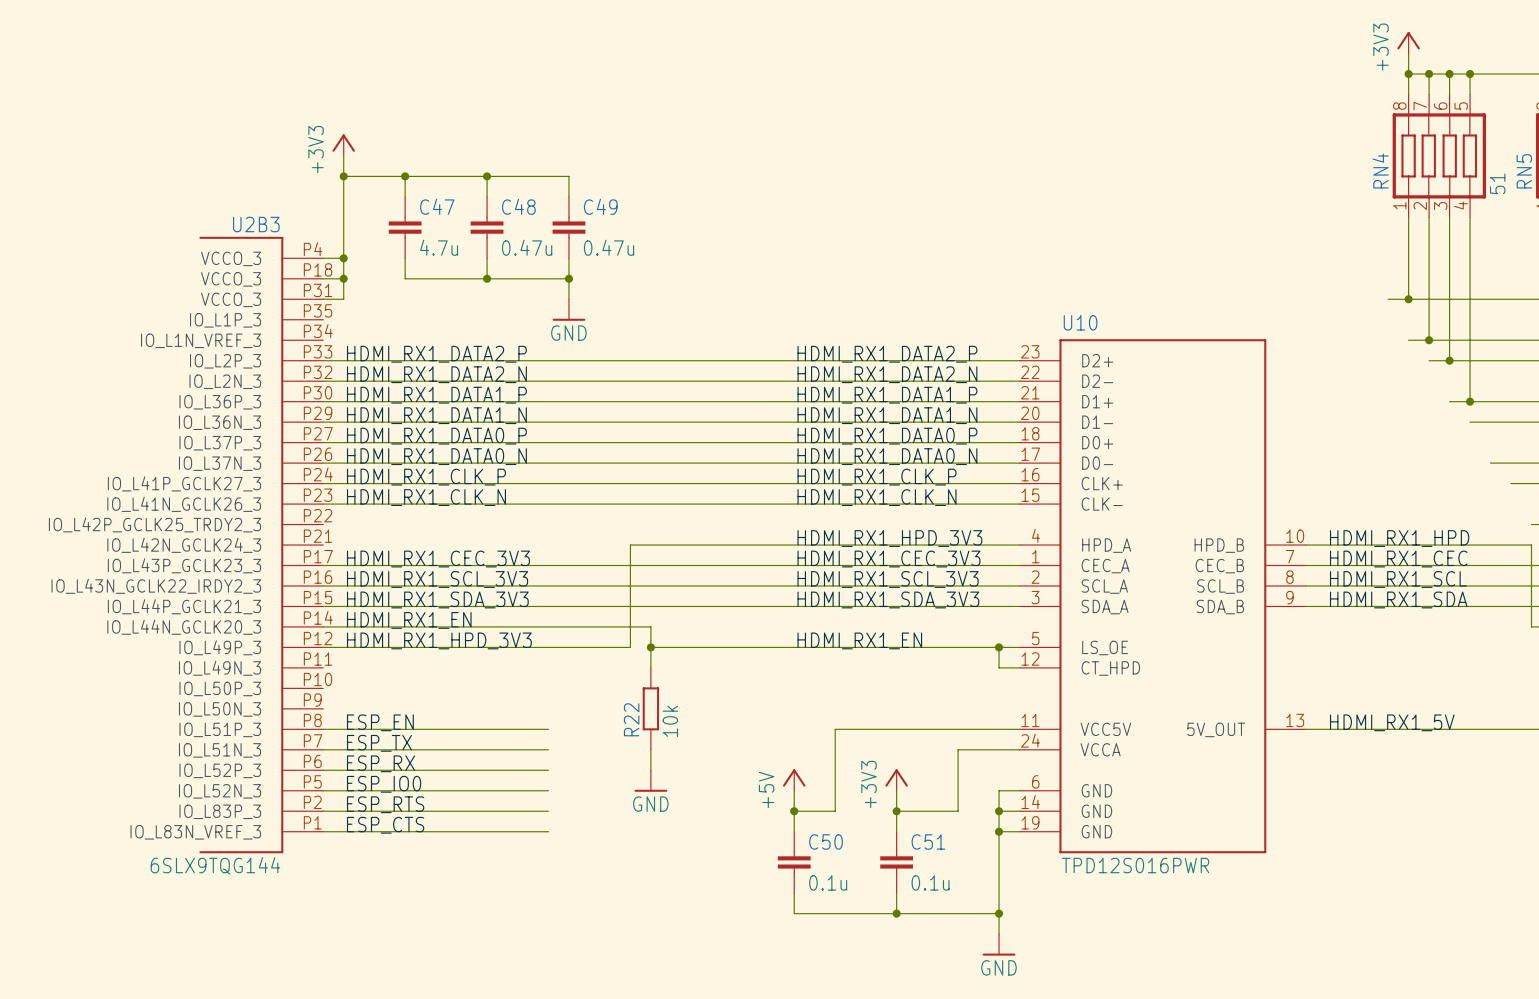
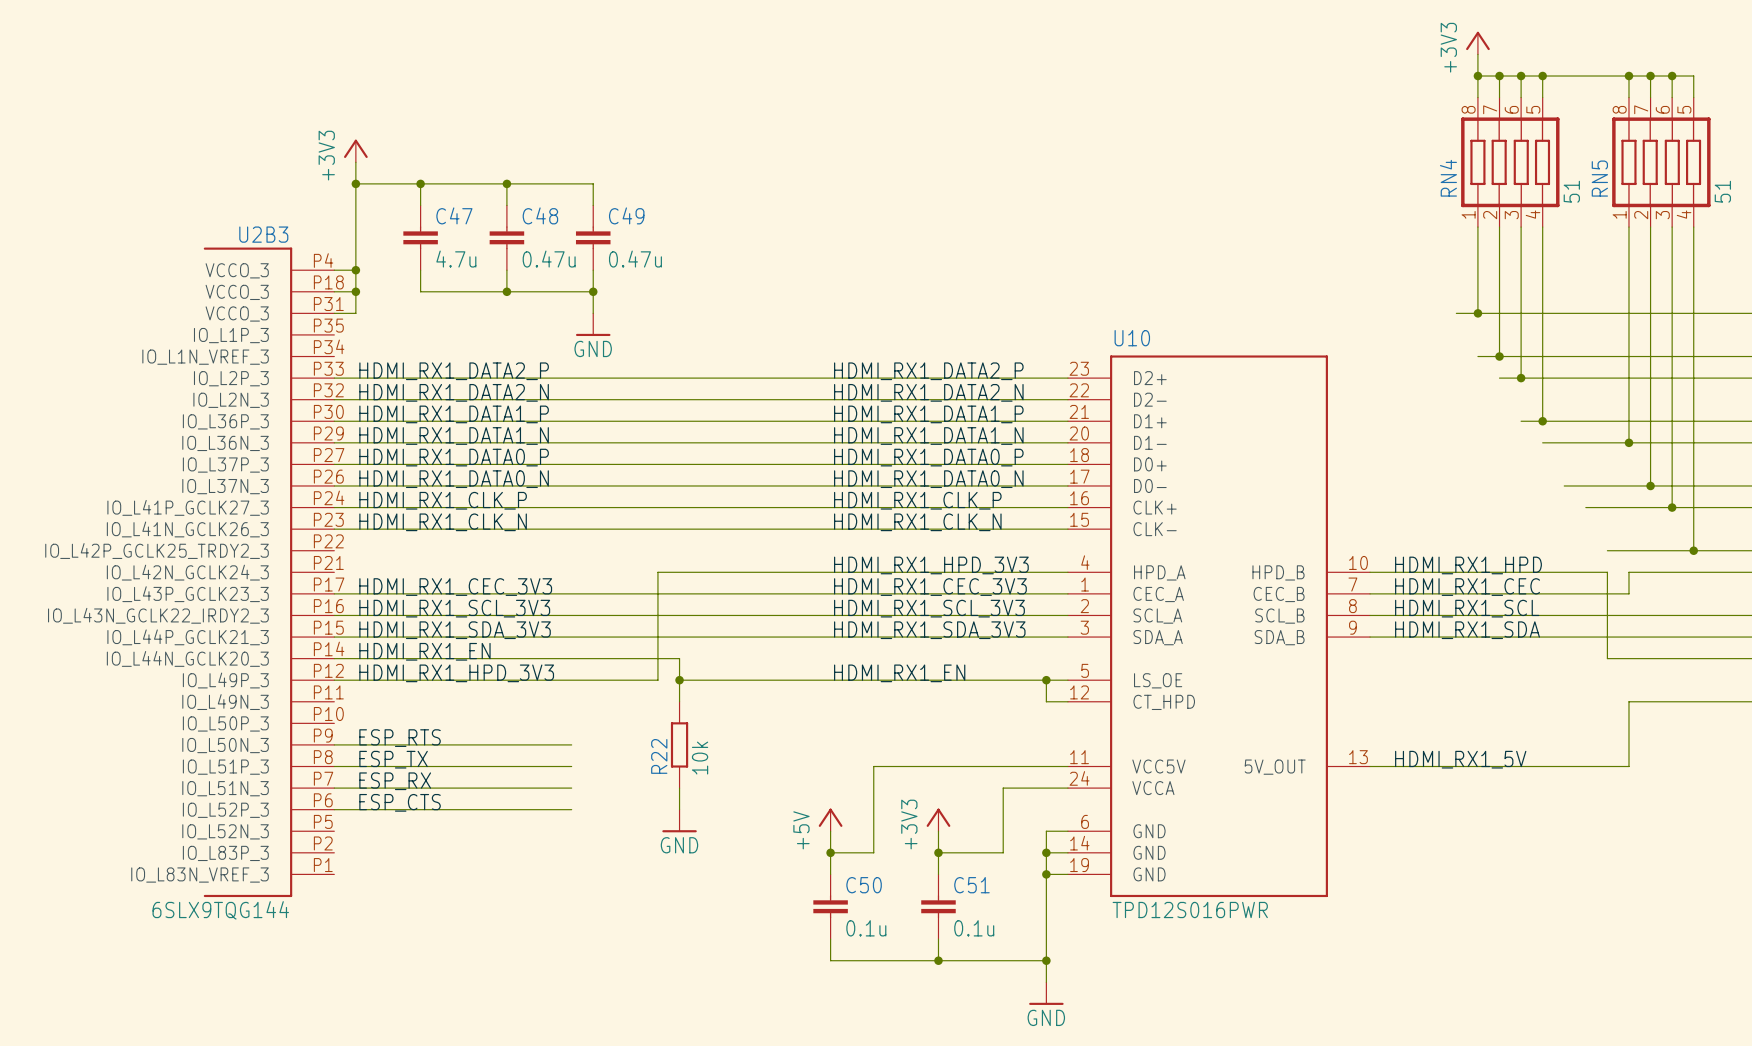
label: ESP_EN (380, 722) -> ESP_TX (393, 759)
label: ESP_TX (379, 743) -> ESP_RX (395, 781)
label: ESP_RX (381, 763) -> ESP_CTS (400, 802)
label: ESP_IO0 (384, 784) -> none
wire: (323, 790) (548, 790) -> (334, 744) (571, 744)
label position: ESP_RTS (385, 804) -> ESP_RTS (400, 738)
wire: (323, 811) (548, 811) -> none
label: ESP_CTS (385, 825) -> none
wire: (323, 831) (548, 831) -> none

